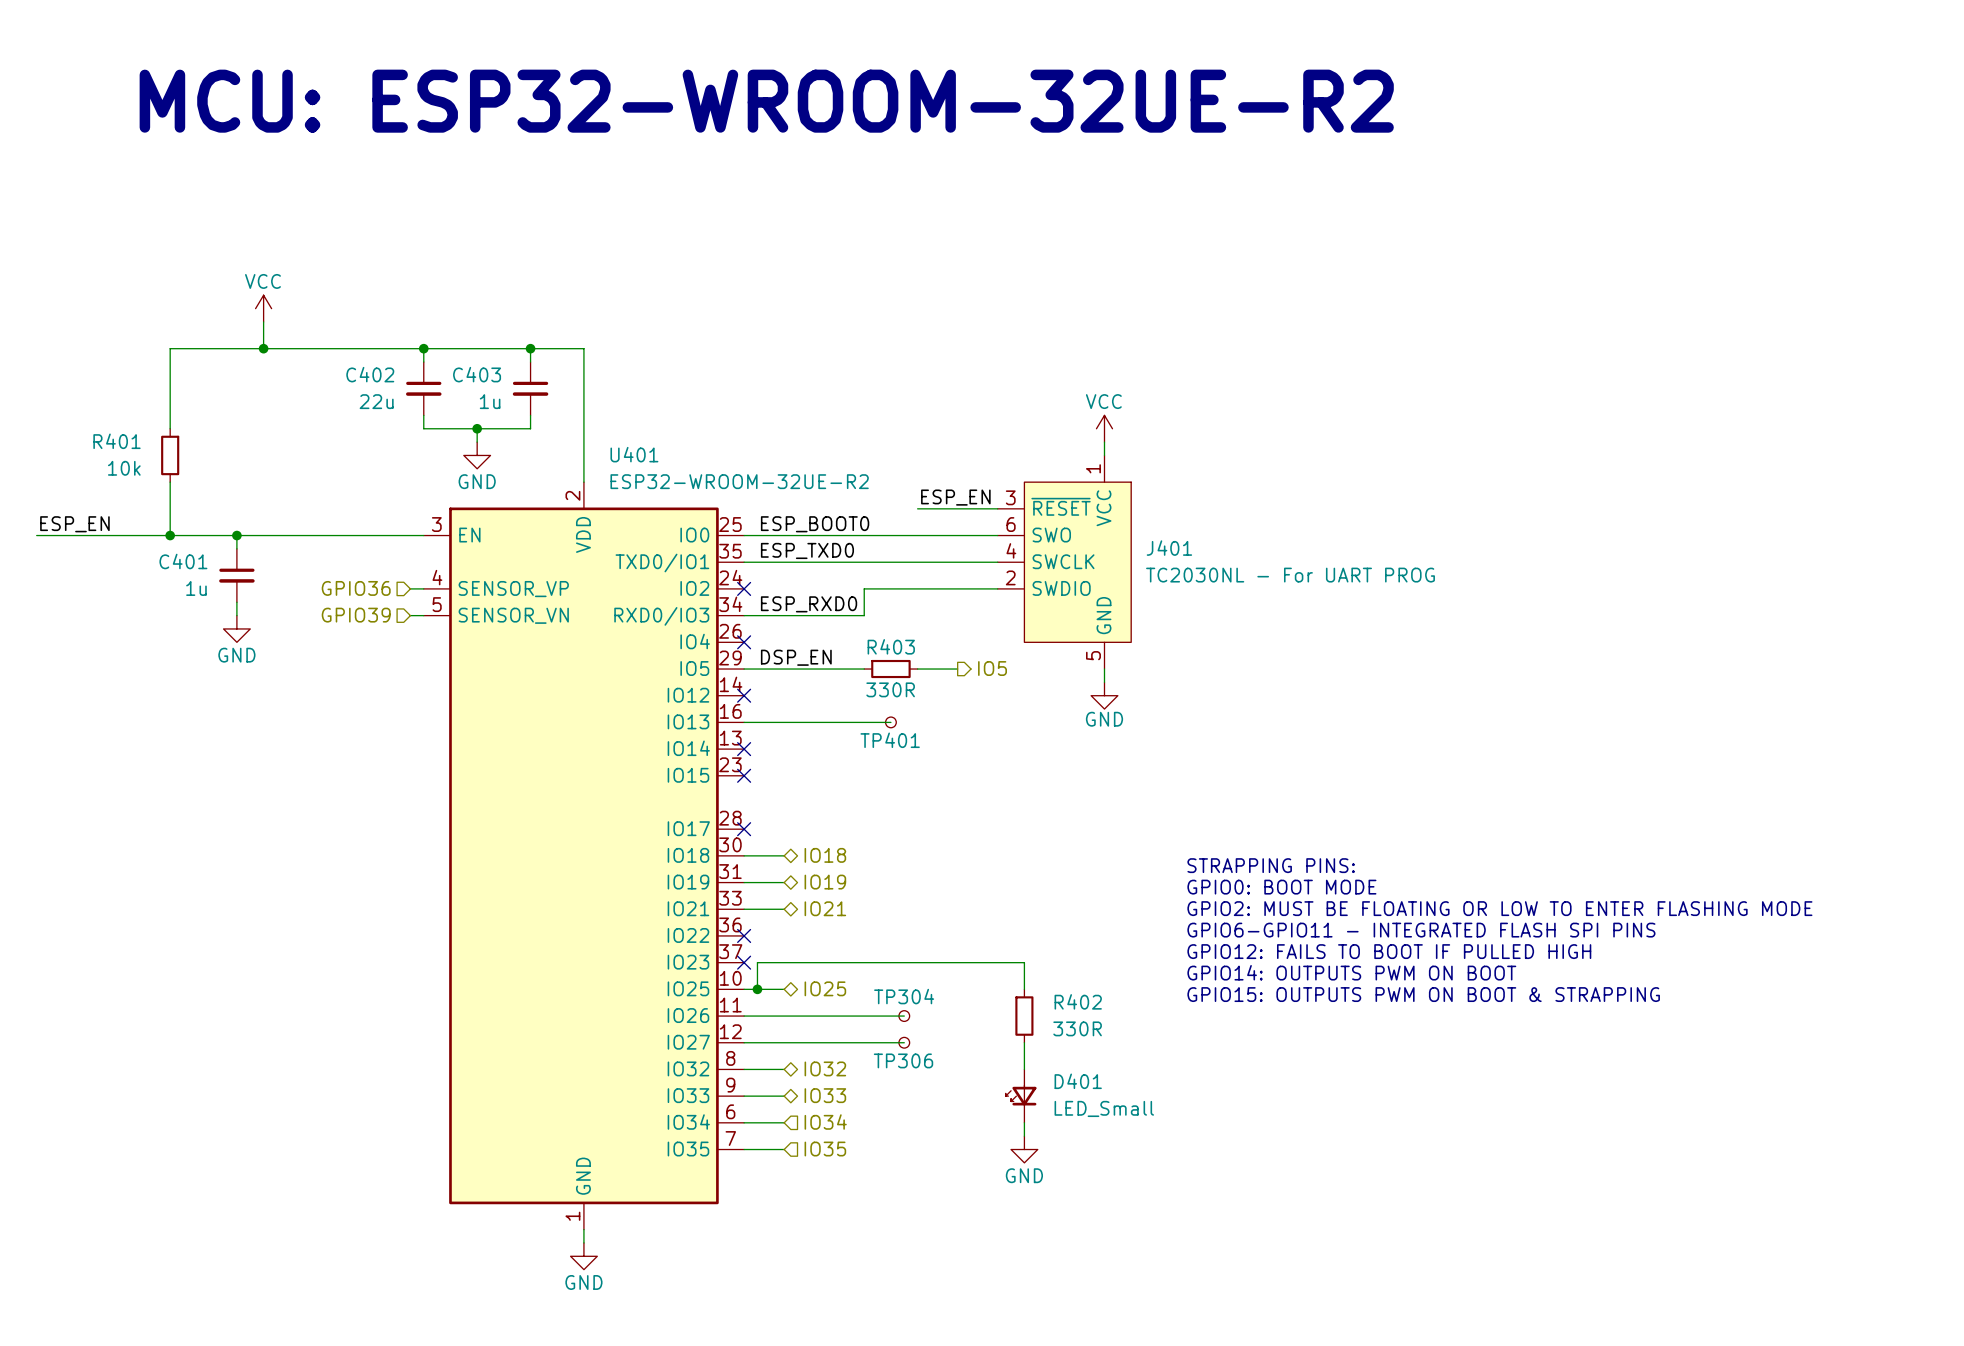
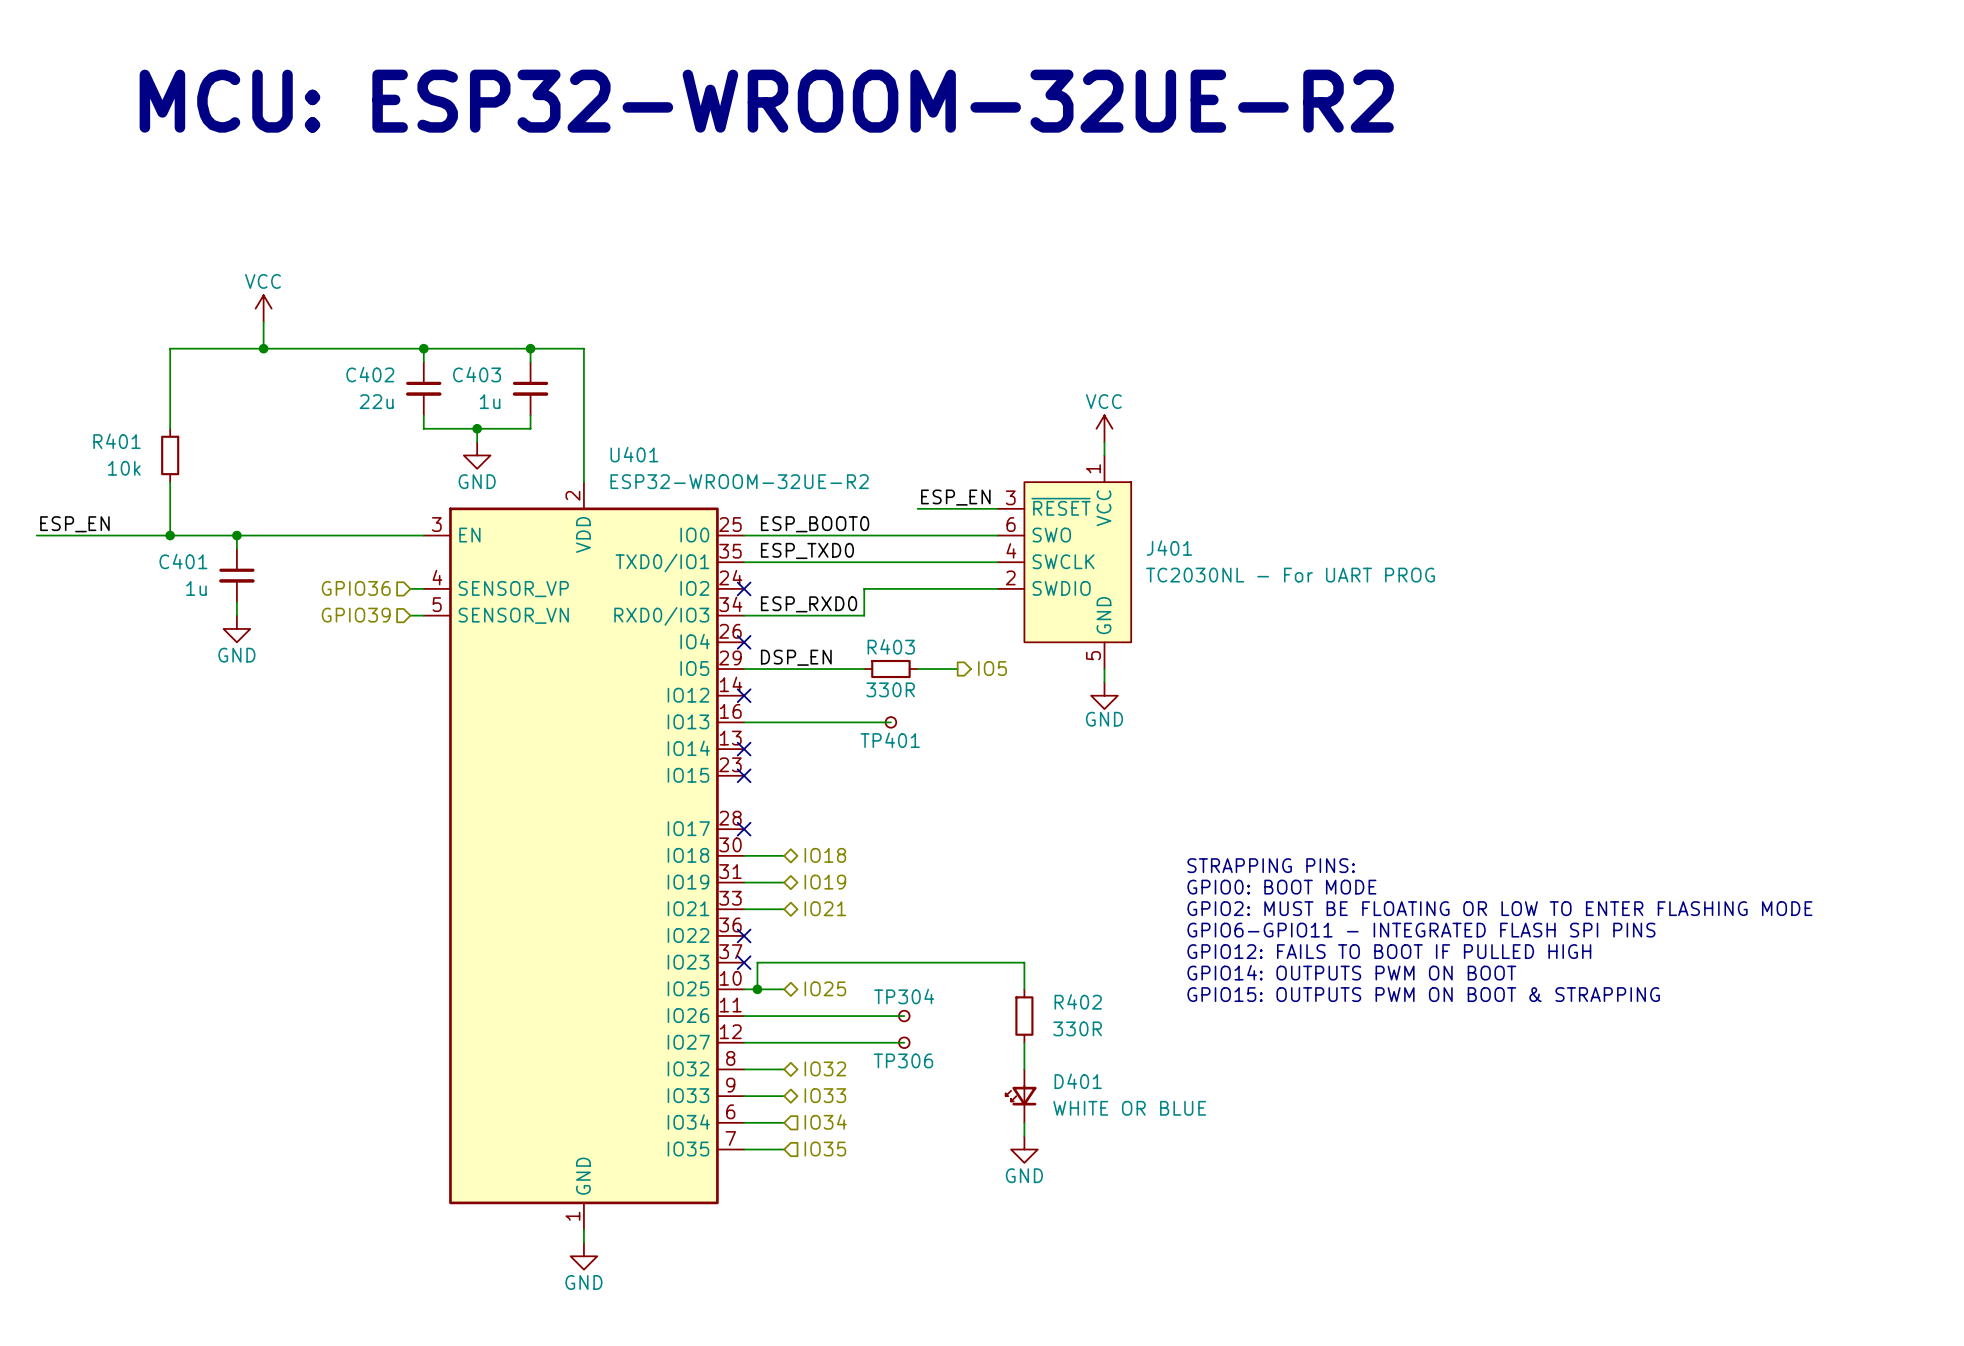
D401 value: LED_Small (1104, 1108) -> WHITE OR BLUE (1129, 1108)

